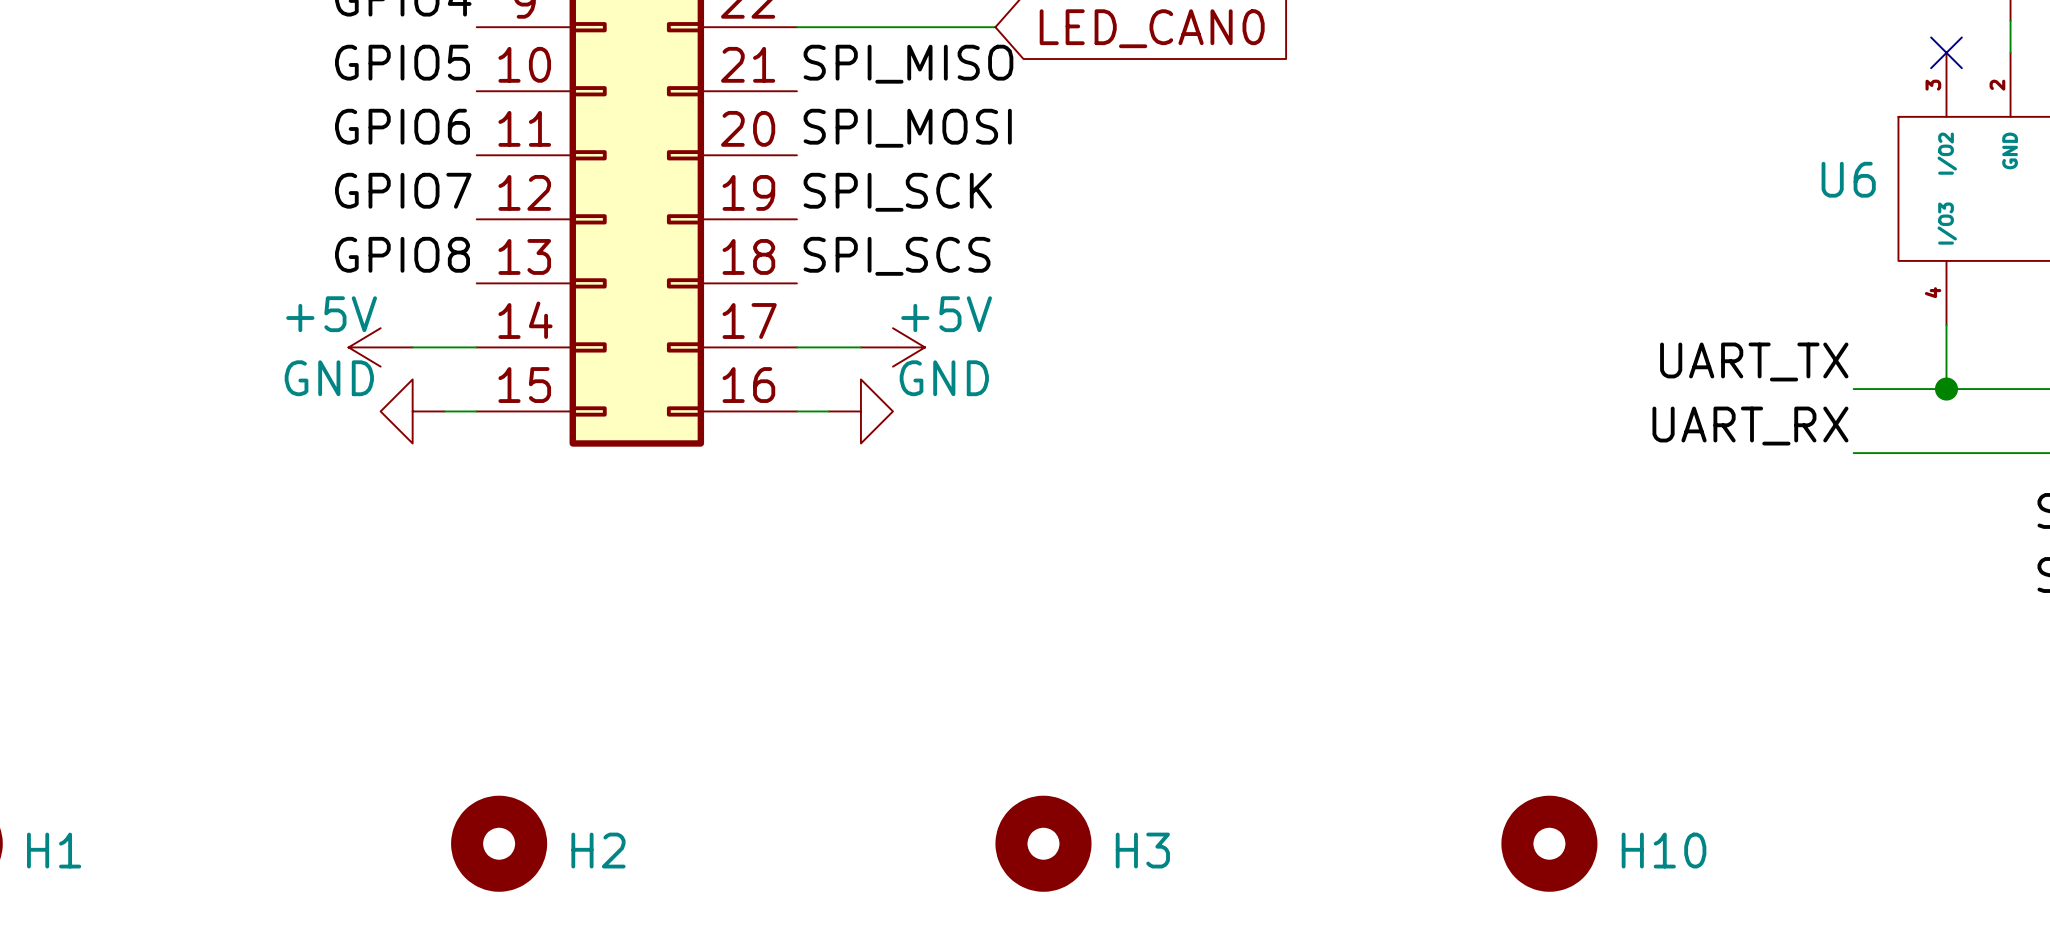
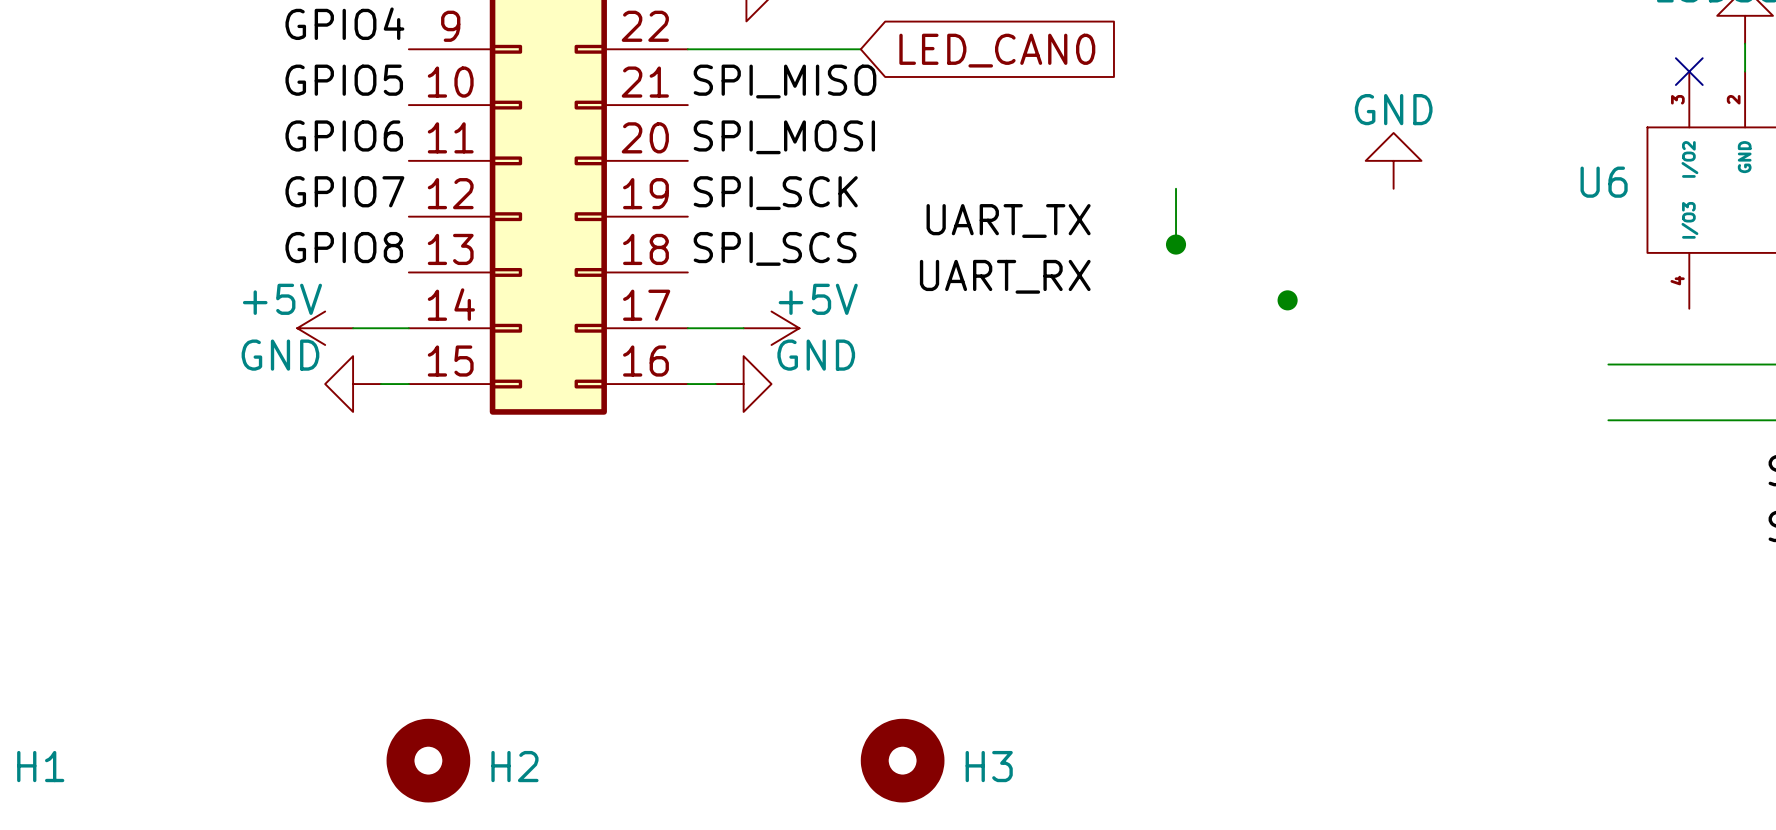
power symbol: none -> GND (1393, 160)
junction: none -> (1176, 244)
junction: none -> (1287, 300)
wire: (1946, 325) (1946, 389) -> (1176, 188) (1176, 244)
label position: UART_TX (1754, 361) -> UART_TX (1008, 220)
junction: (1946, 389) -> none
label position: UART_RX (1750, 426) -> UART_RX (1005, 276)
H10: (1549, 843) -> none

